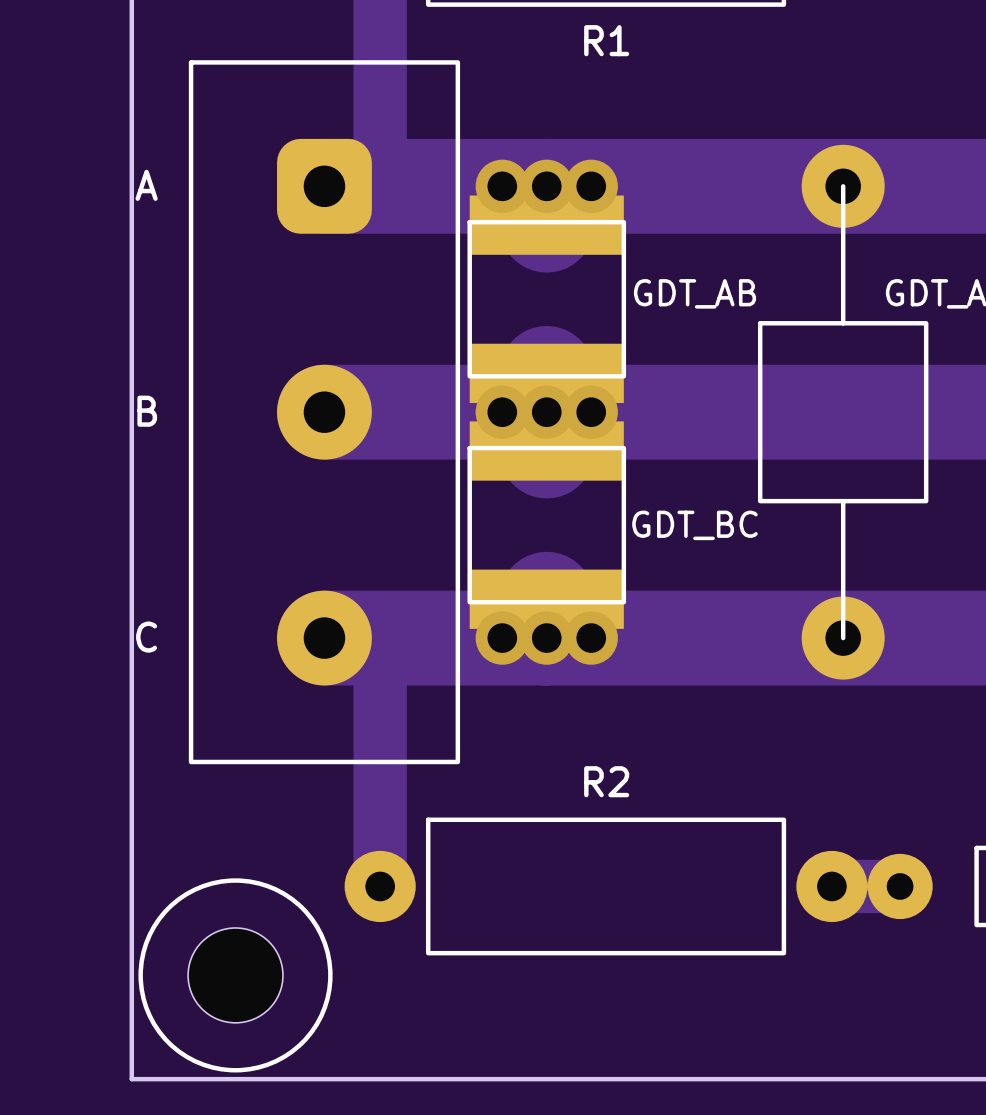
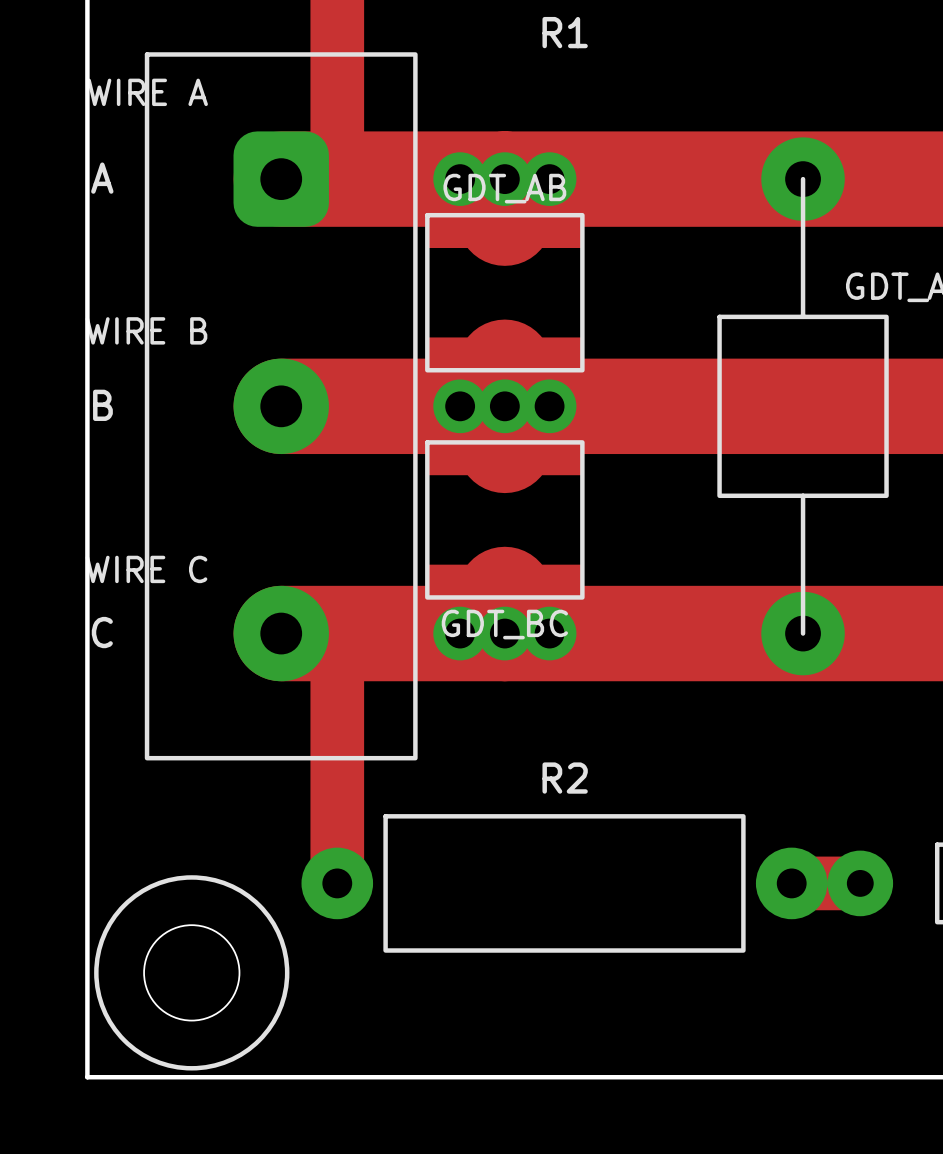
text: none -> WIRE A (147, 92)
GDT_AB name position: GDT_AB (694, 293) -> GDT_AB (504, 188)
text: none -> WIRE B (146, 330)
GDT_BC name position: GDT_BC (694, 525) -> GDT_BC (504, 624)
text: none -> WIRE C (146, 569)

